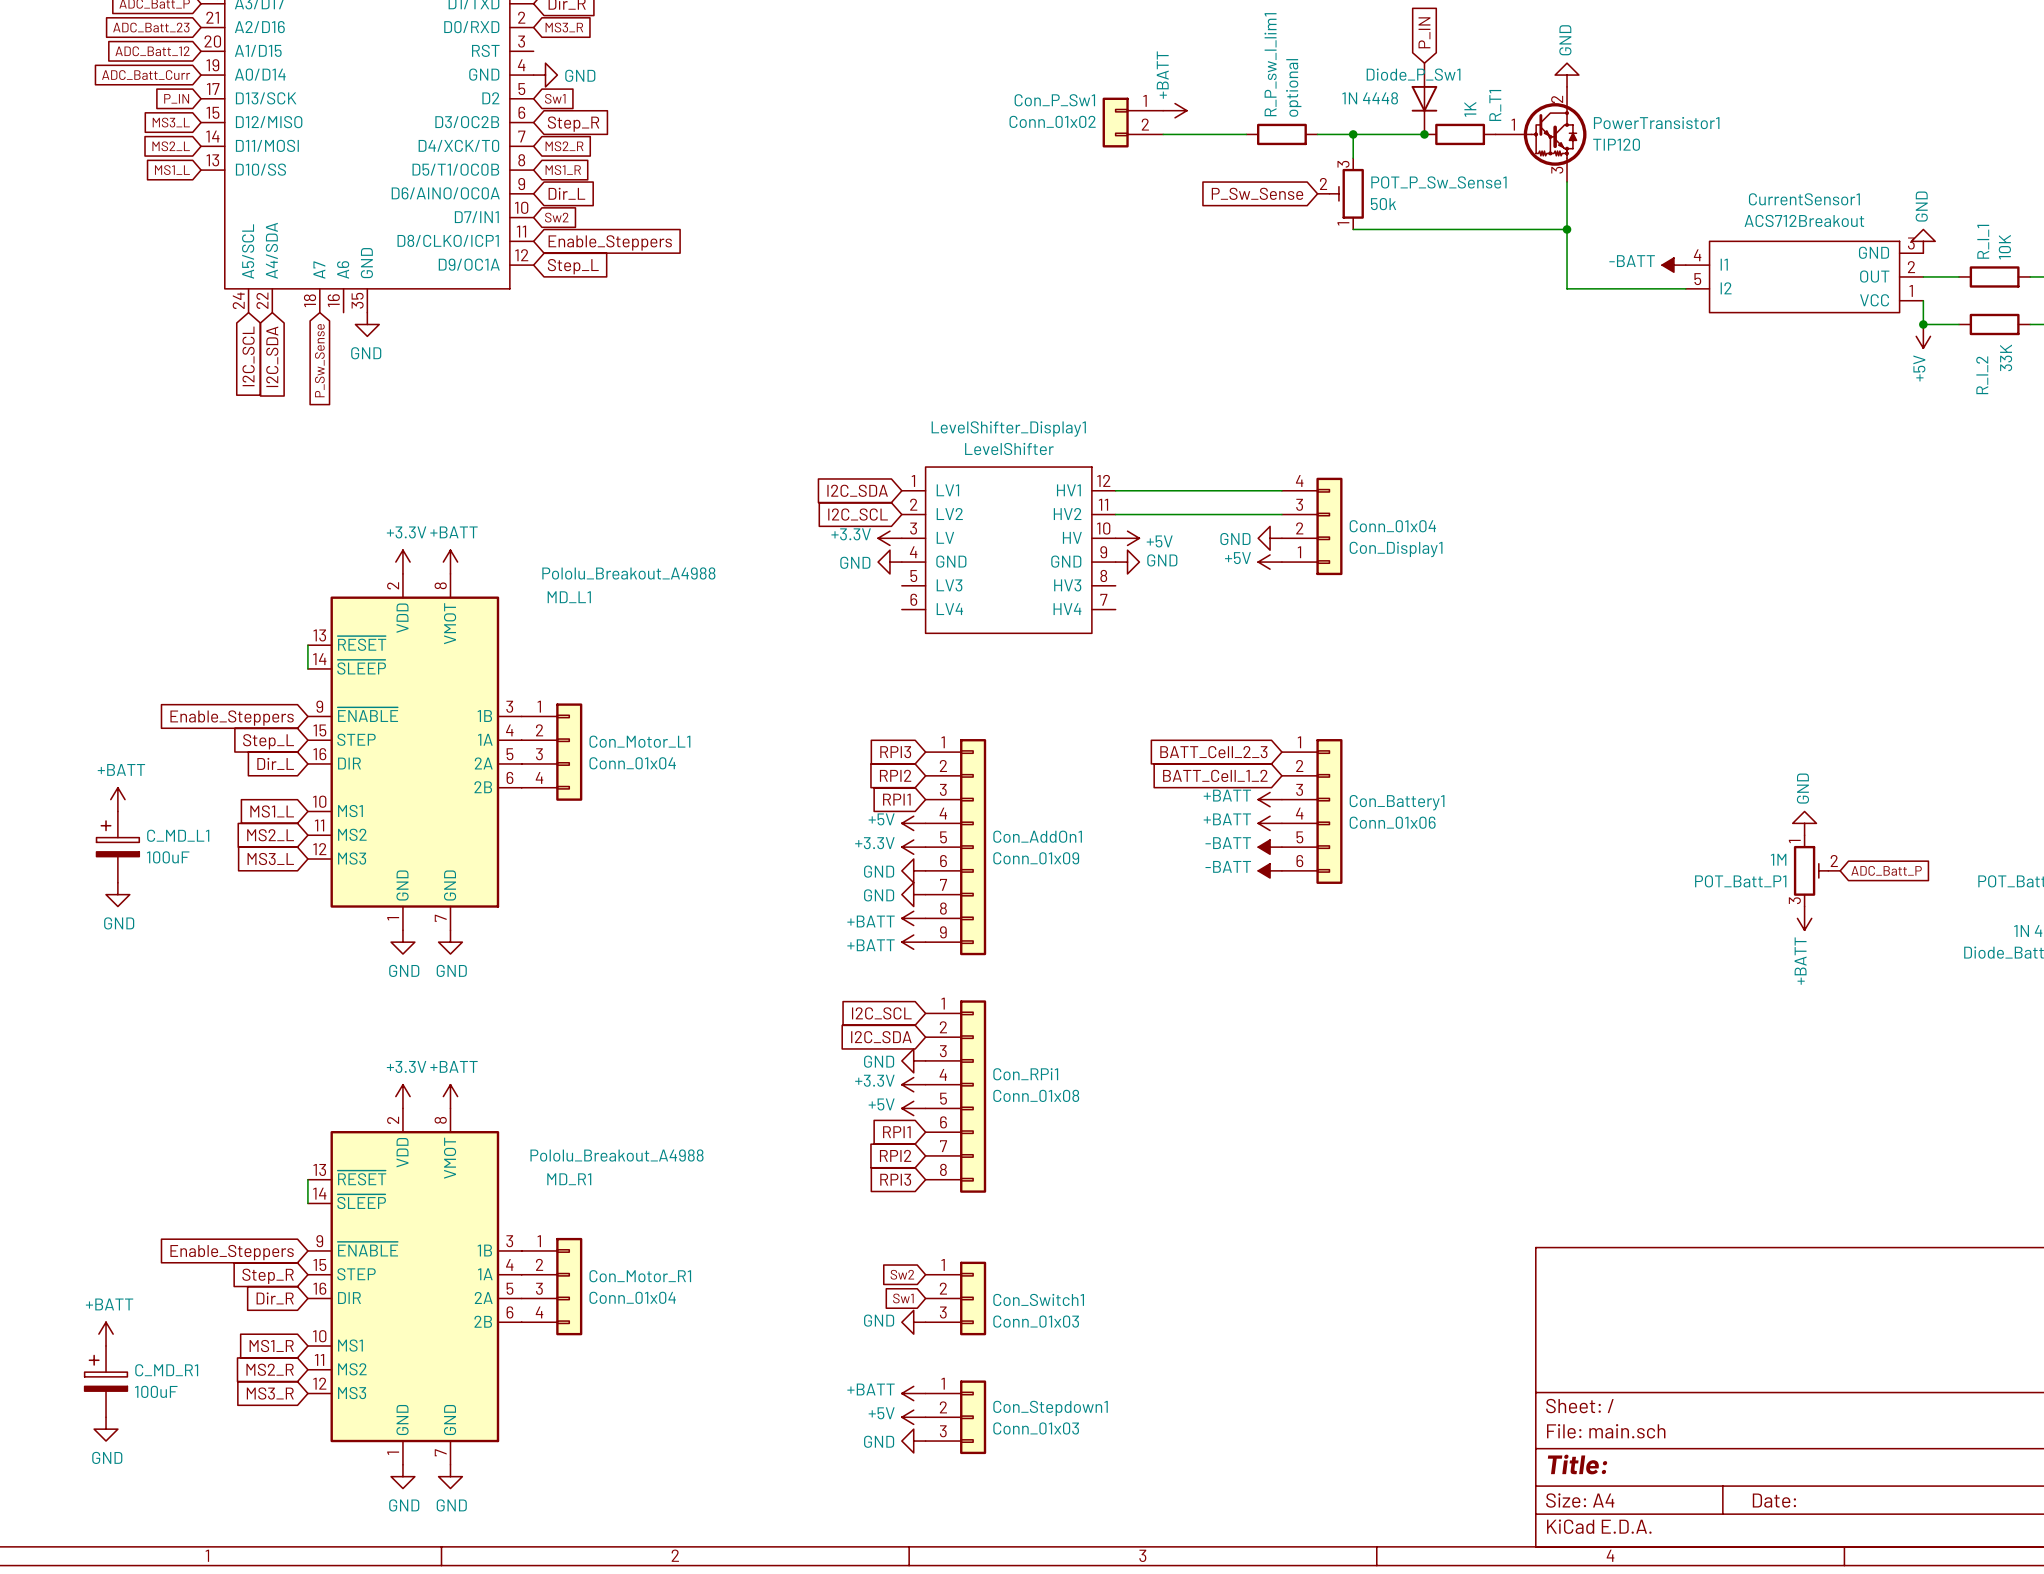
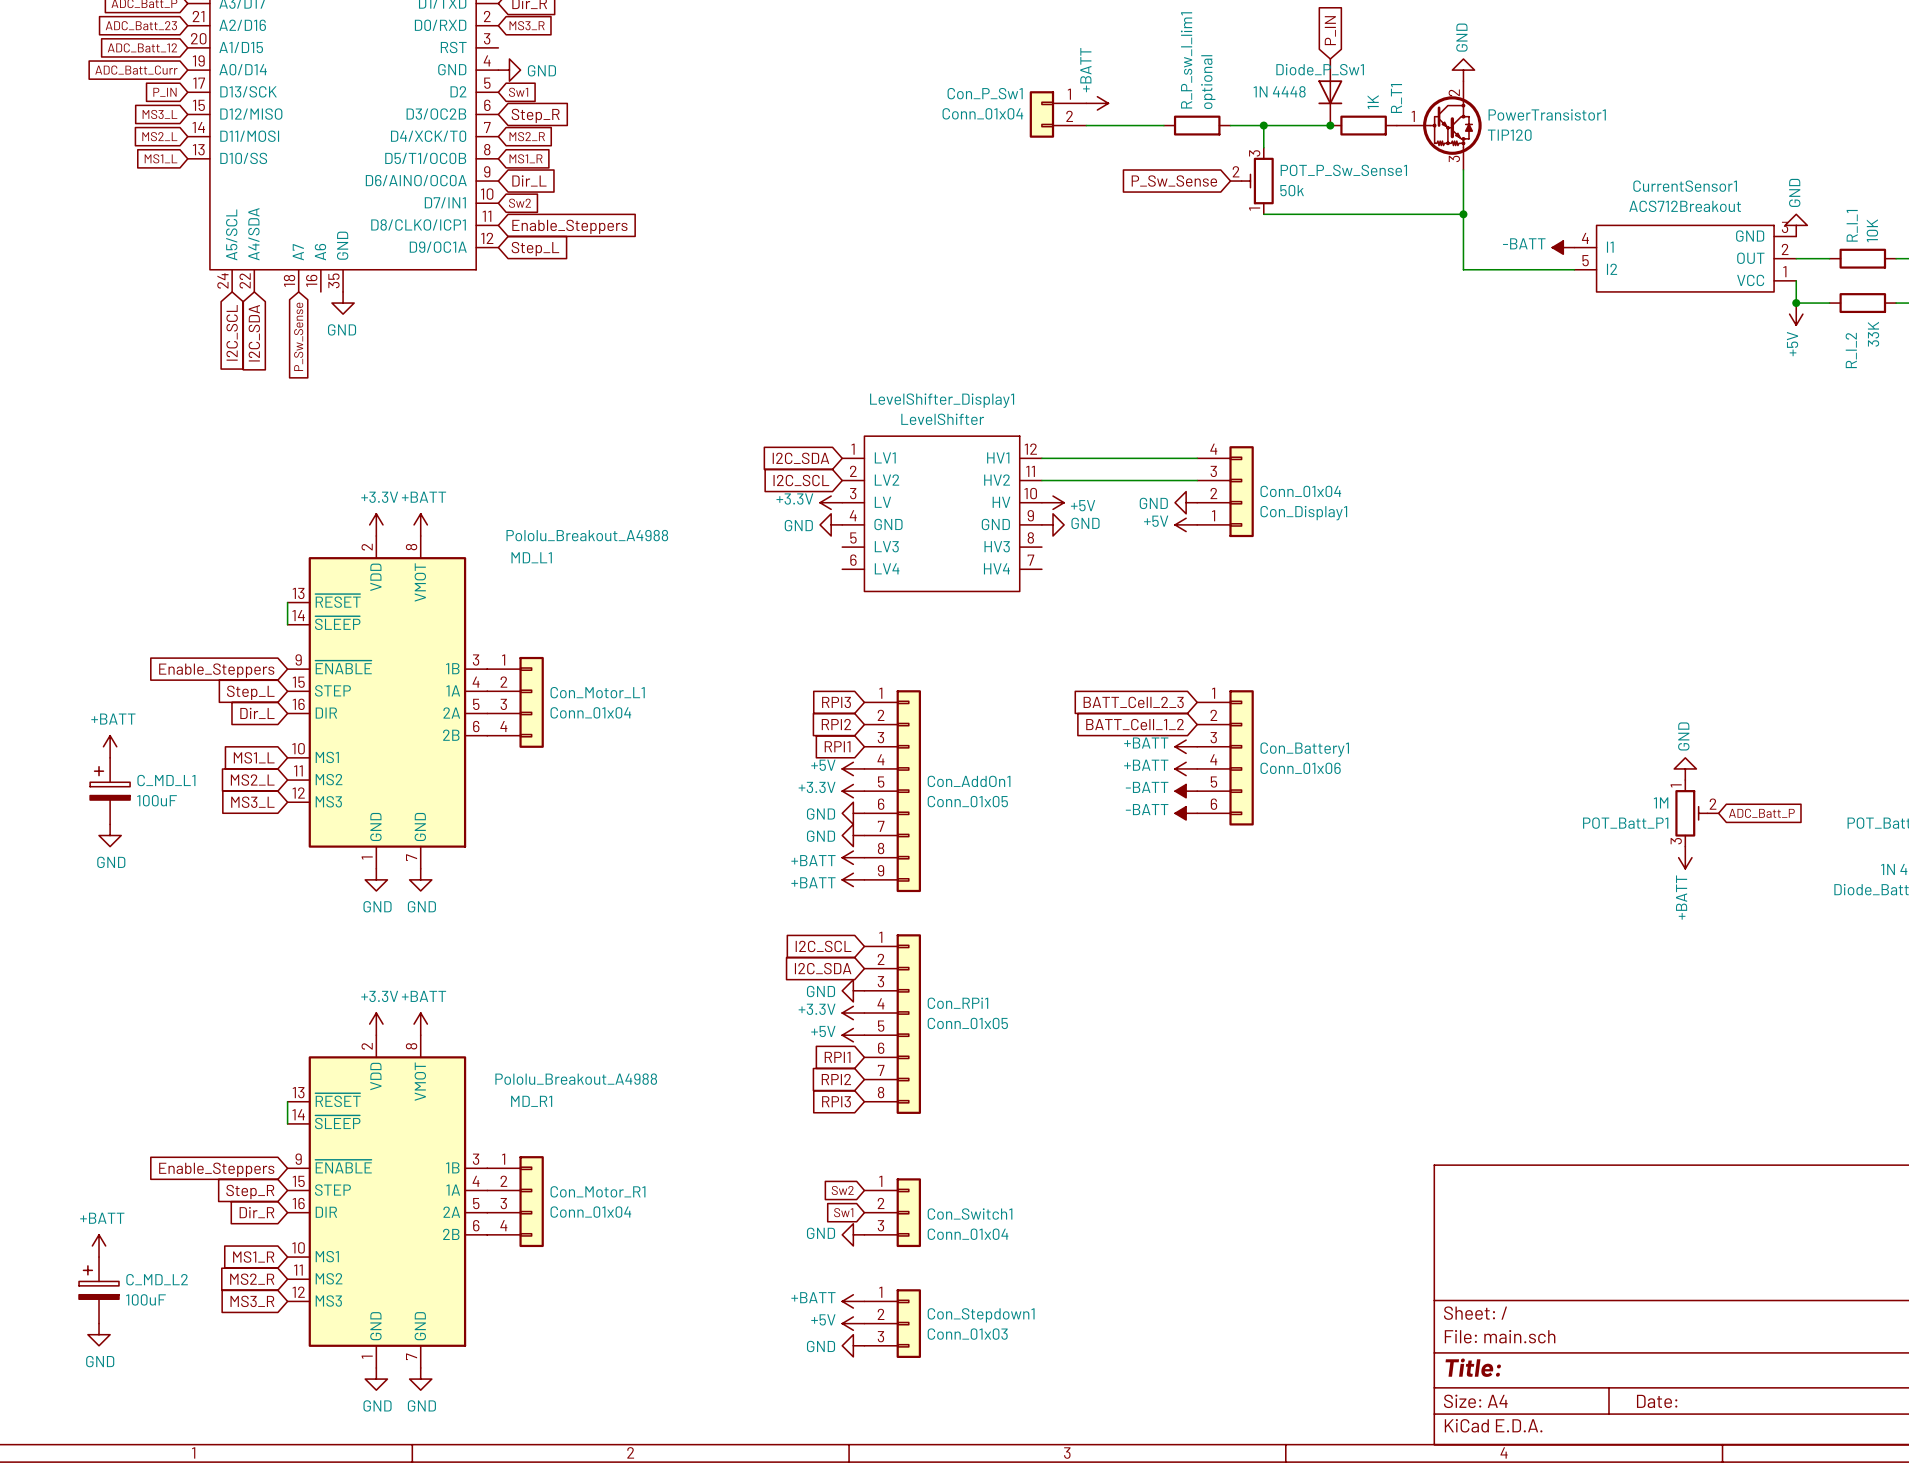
Con_P_Sw1 value: Conn_01x02 (1052, 121) -> Conn_01x04 (982, 113)
Con_AddOn1 value: Conn_01x09 (1036, 858) -> Conn_01x05 (967, 801)
Con_RPi1 value: Conn_01x08 (1036, 1095) -> Conn_01x05 (967, 1023)
Con_Switch1 value: Conn_01x03 (1036, 1321) -> Conn_01x04 (968, 1234)
C_MD_R1 name: C_MD_R1 (166, 1370) -> C_MD_L2 (157, 1279)

